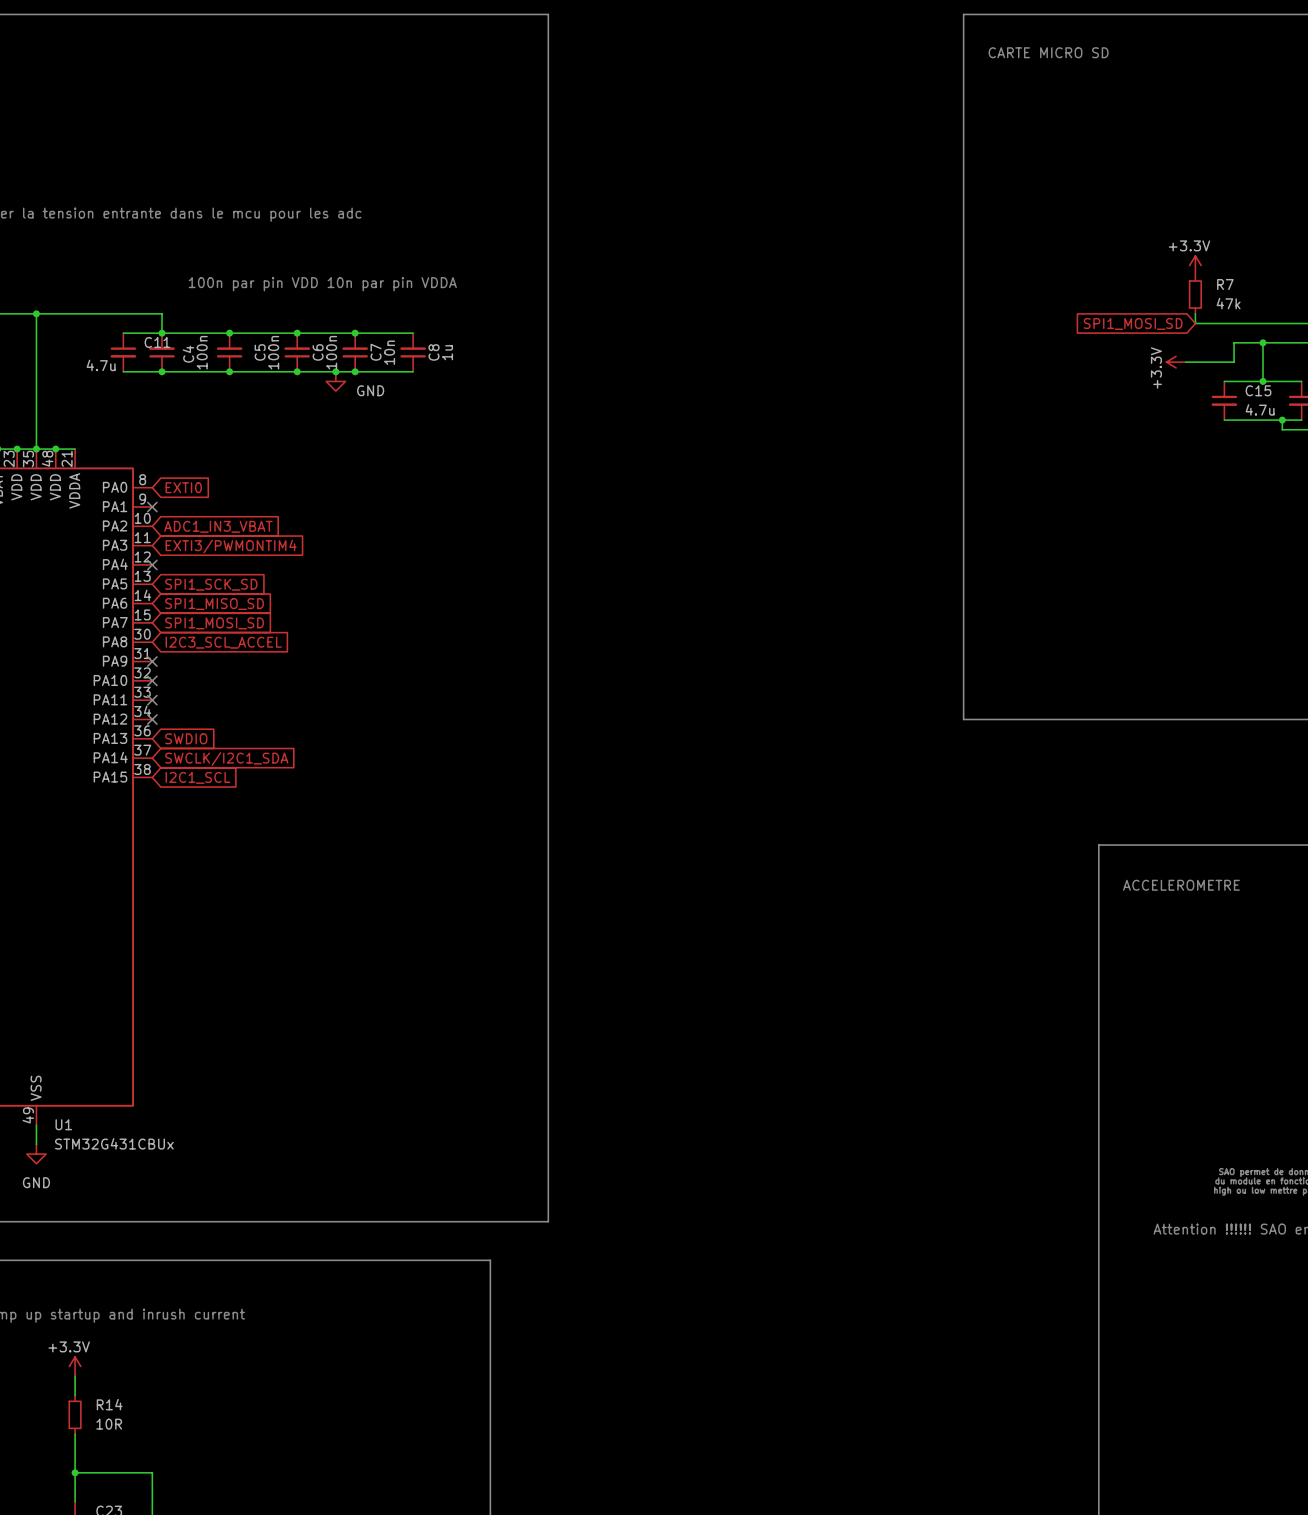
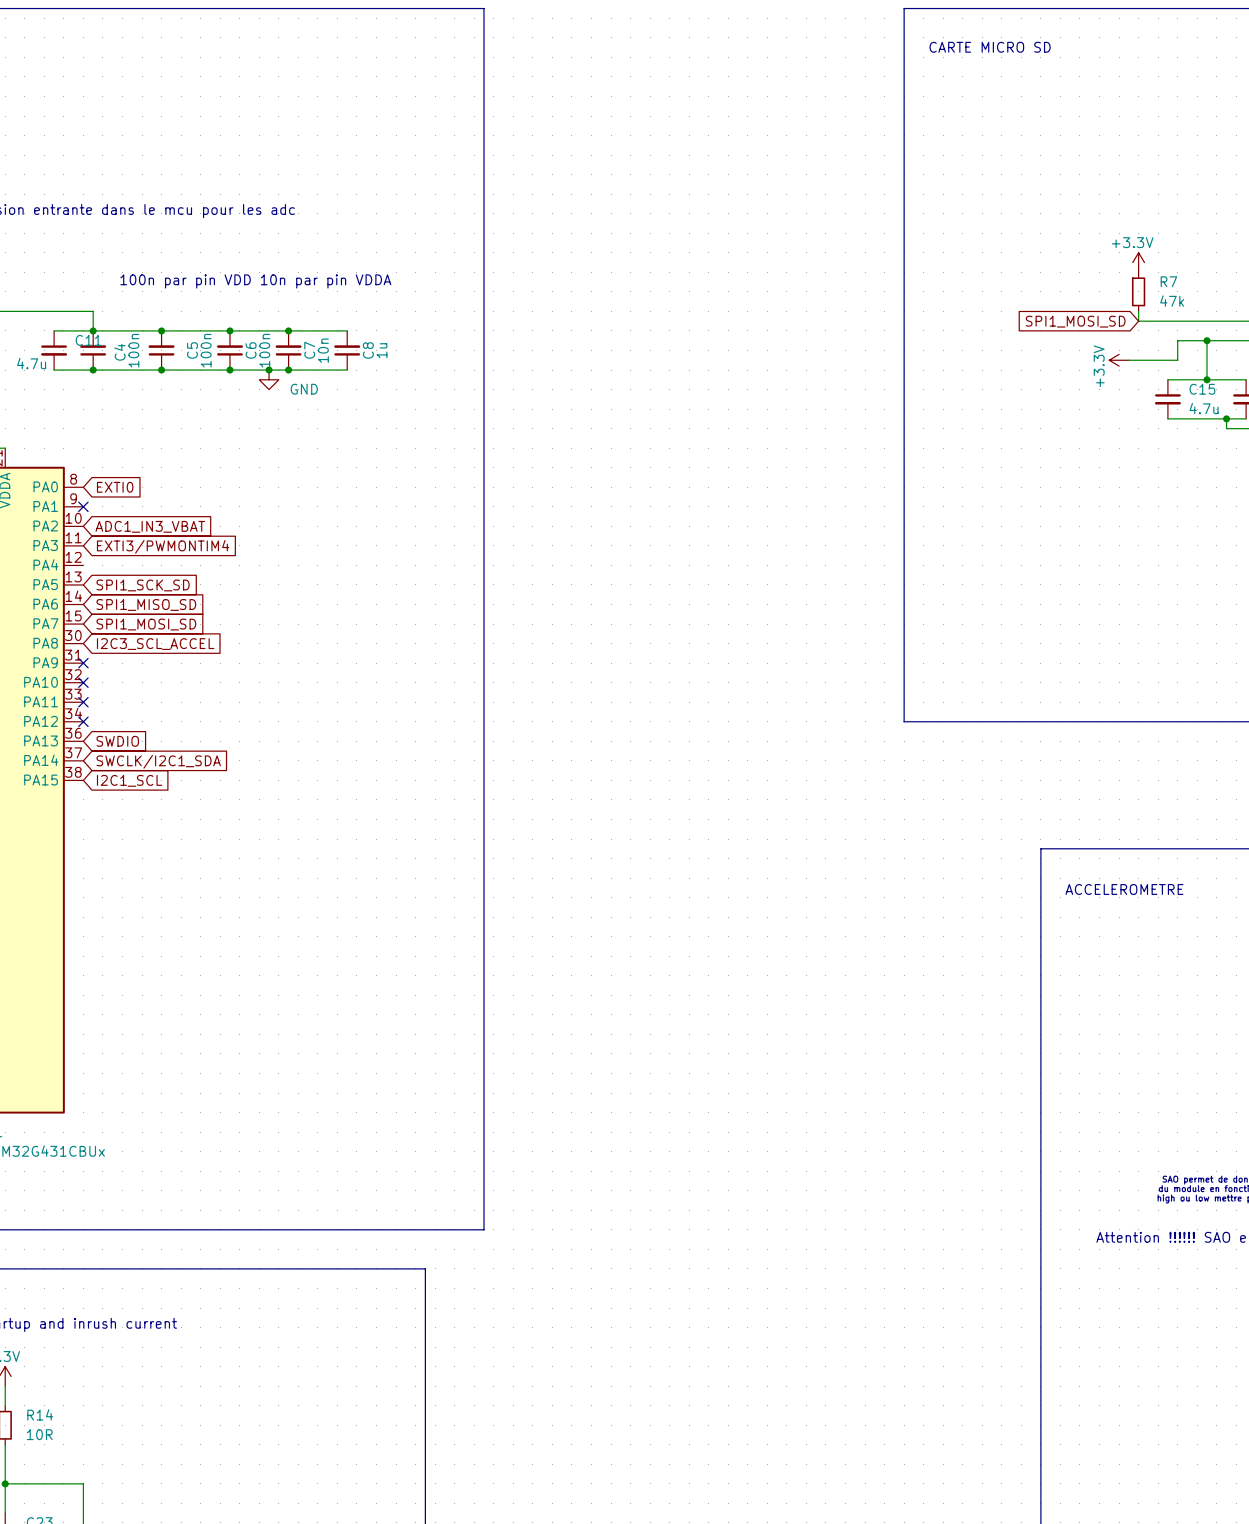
no-connect mark: (152, 564) -> none

